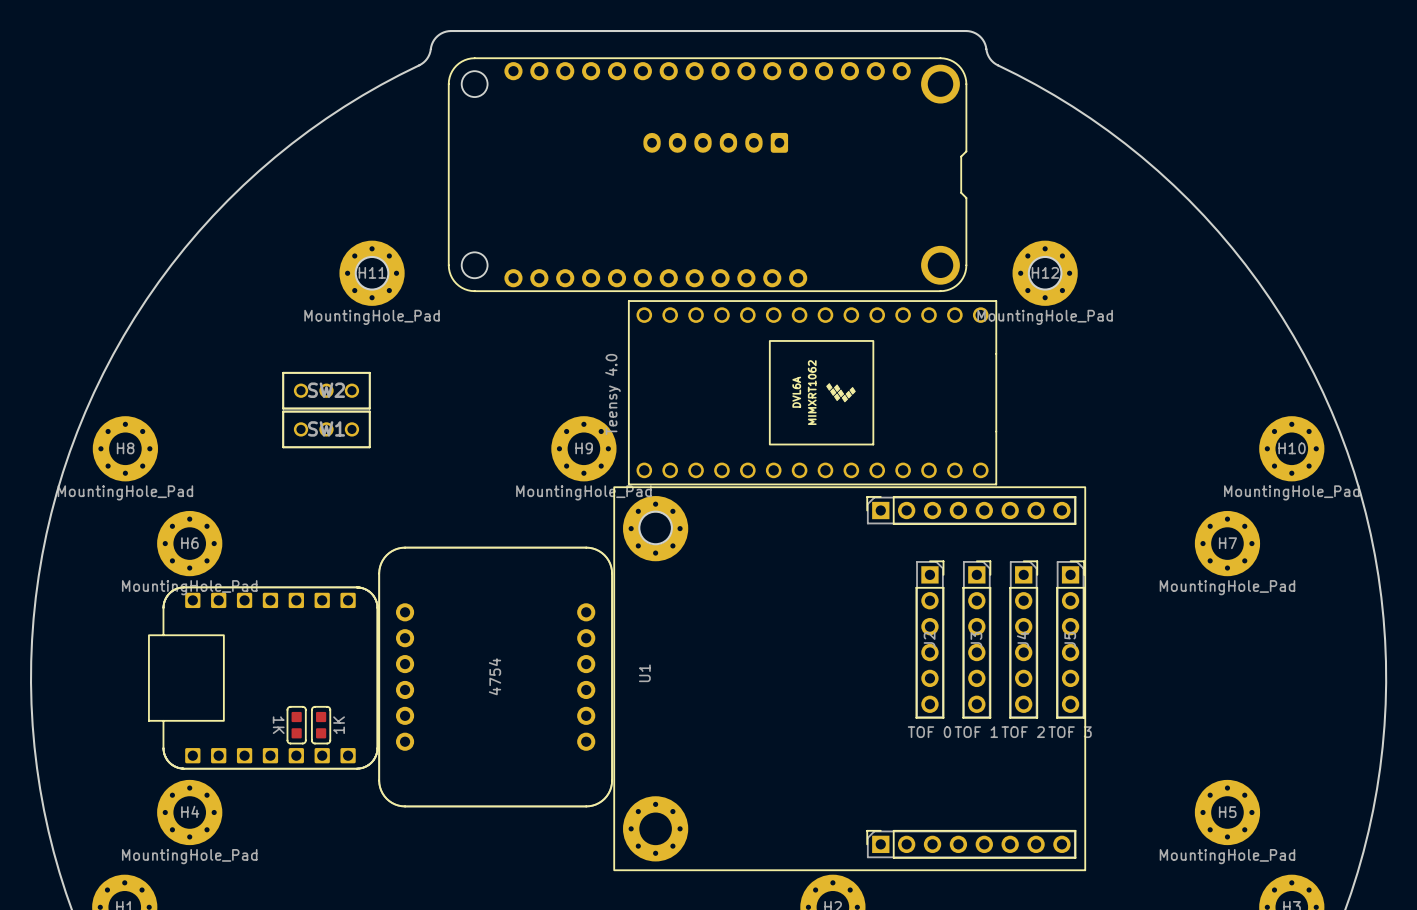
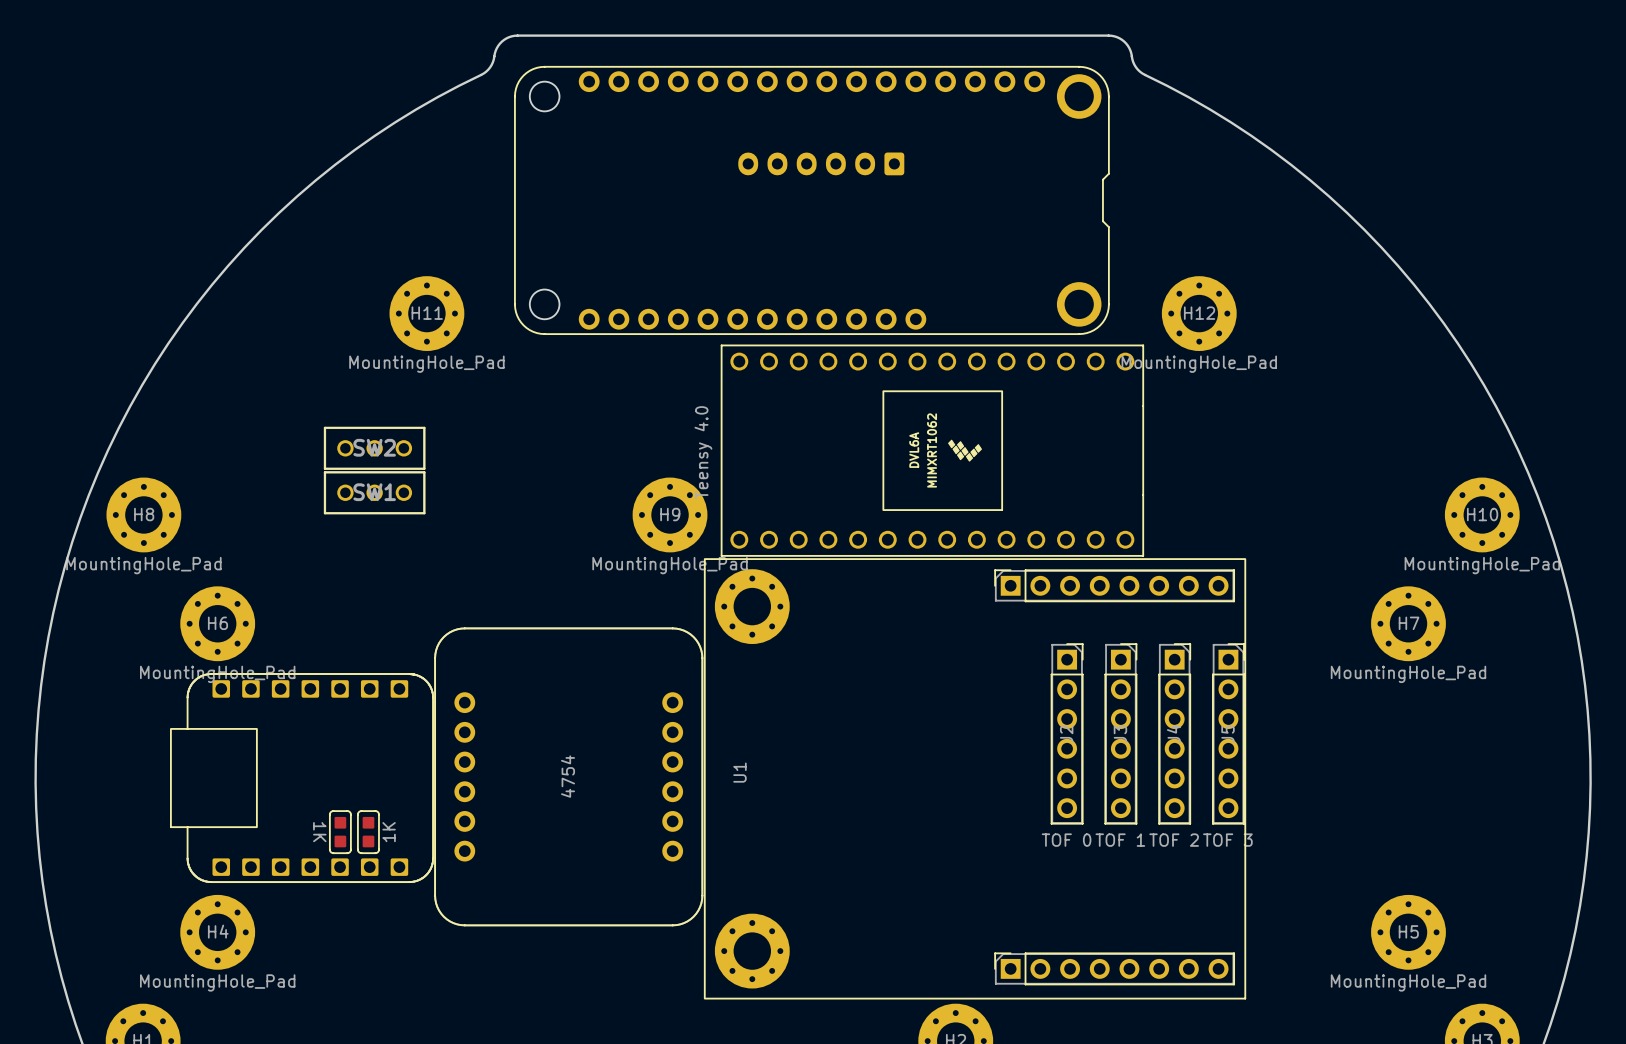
round board edge: [354, 255, 390, 291] -> none
round board edge: [1027, 255, 1063, 291] -> none
round board edge: [638, 510, 673, 546] -> none

